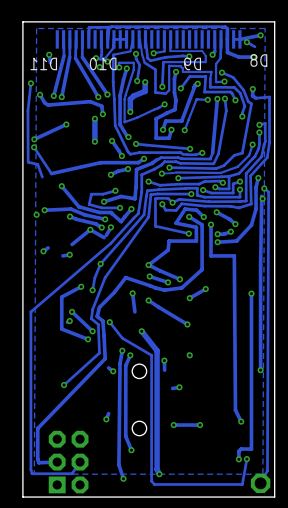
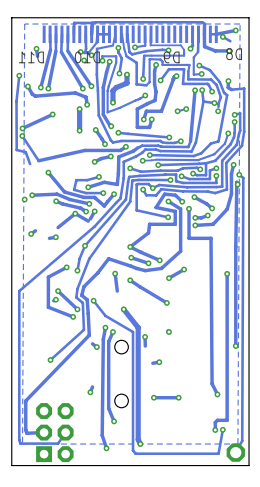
track: (207, 99) (196, 99) (184, 130) -> none
via: (207, 99) -> none
track: none -> (203, 101) (214, 103)
via: none -> (214, 103)
via: (242, 116) -> none
track: none -> (186, 109) (177, 111)
via: none -> (186, 109)
via: none -> (177, 111)
via: none -> (218, 111)
via: (184, 130) -> none

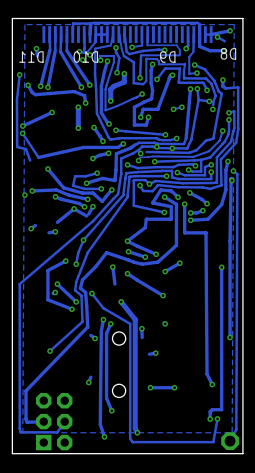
via: none -> (156, 146)
via: none -> (172, 148)
via: (149, 155) -> none
via: none -> (140, 153)
via: (142, 160) -> none
via: none -> (138, 160)

